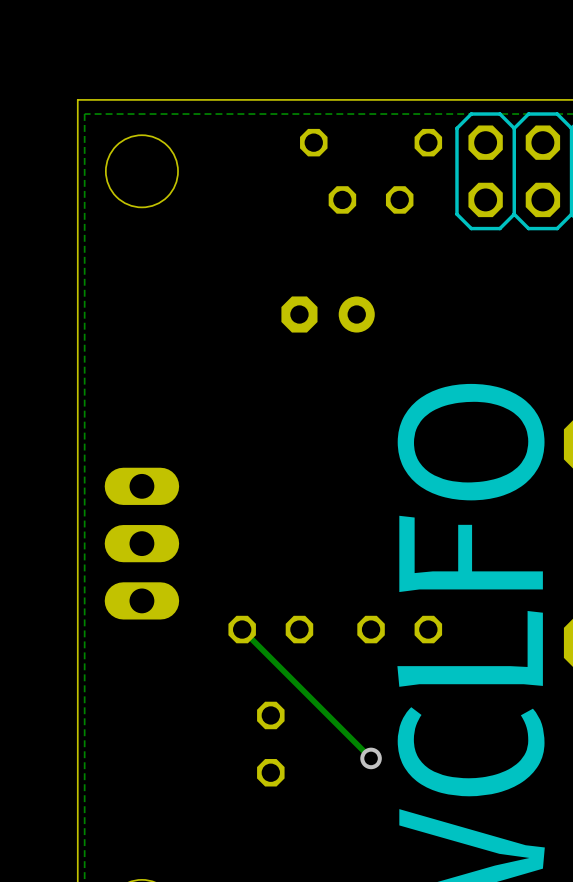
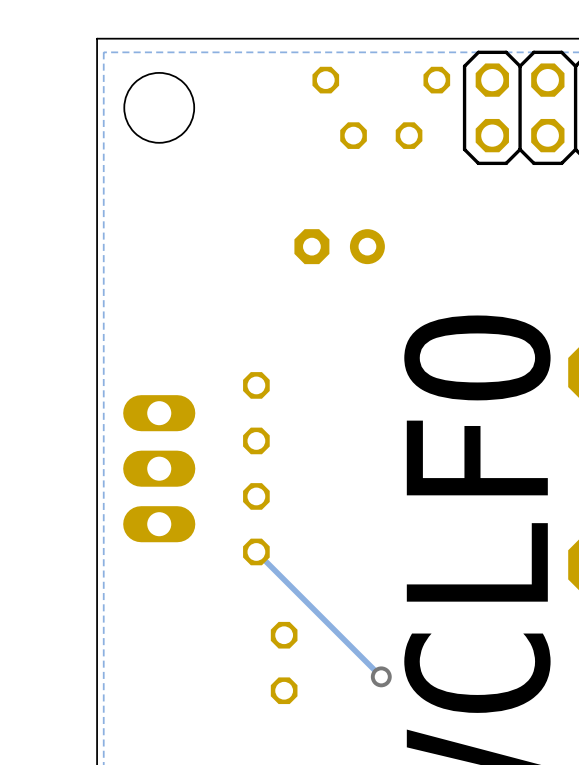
part: none -> (256, 413)
part rotation: 0° (270, 629) -> 90° clockwise (256, 524)
part: (399, 629) -> none

